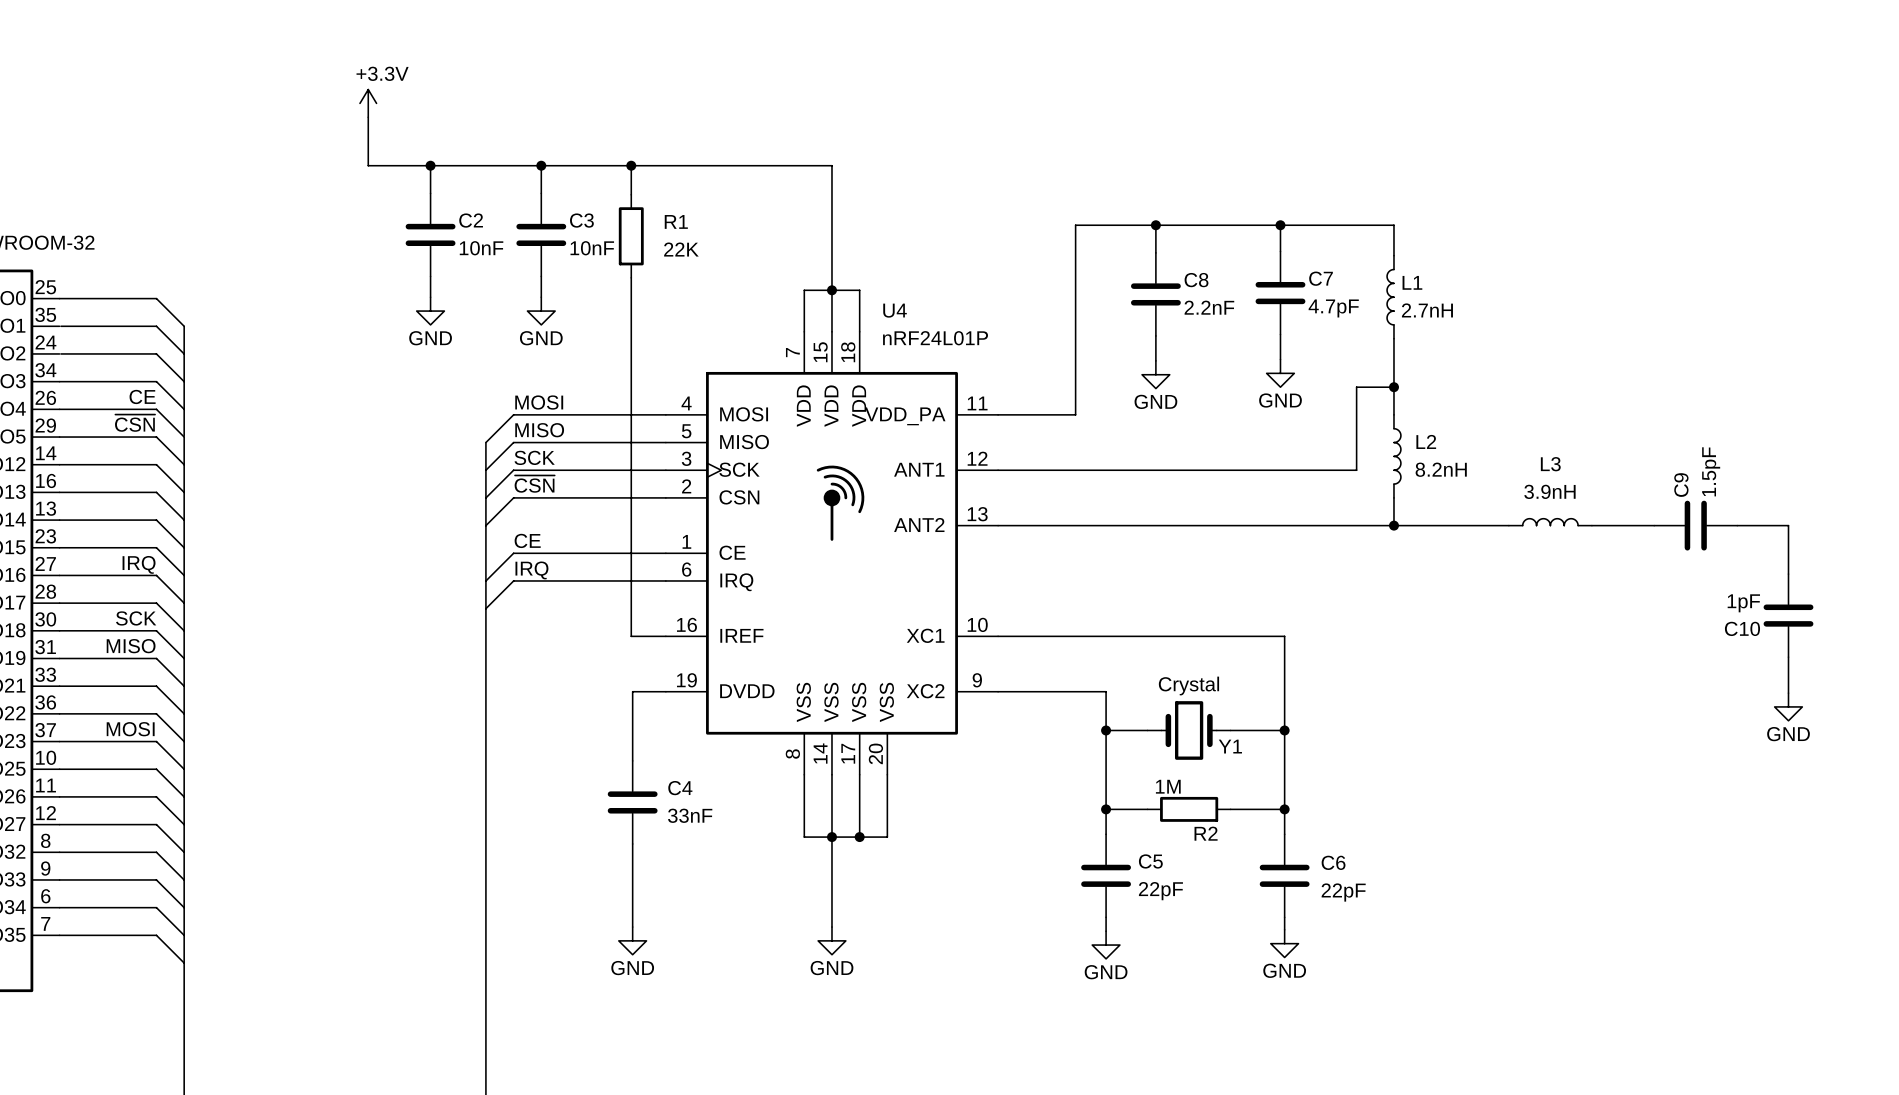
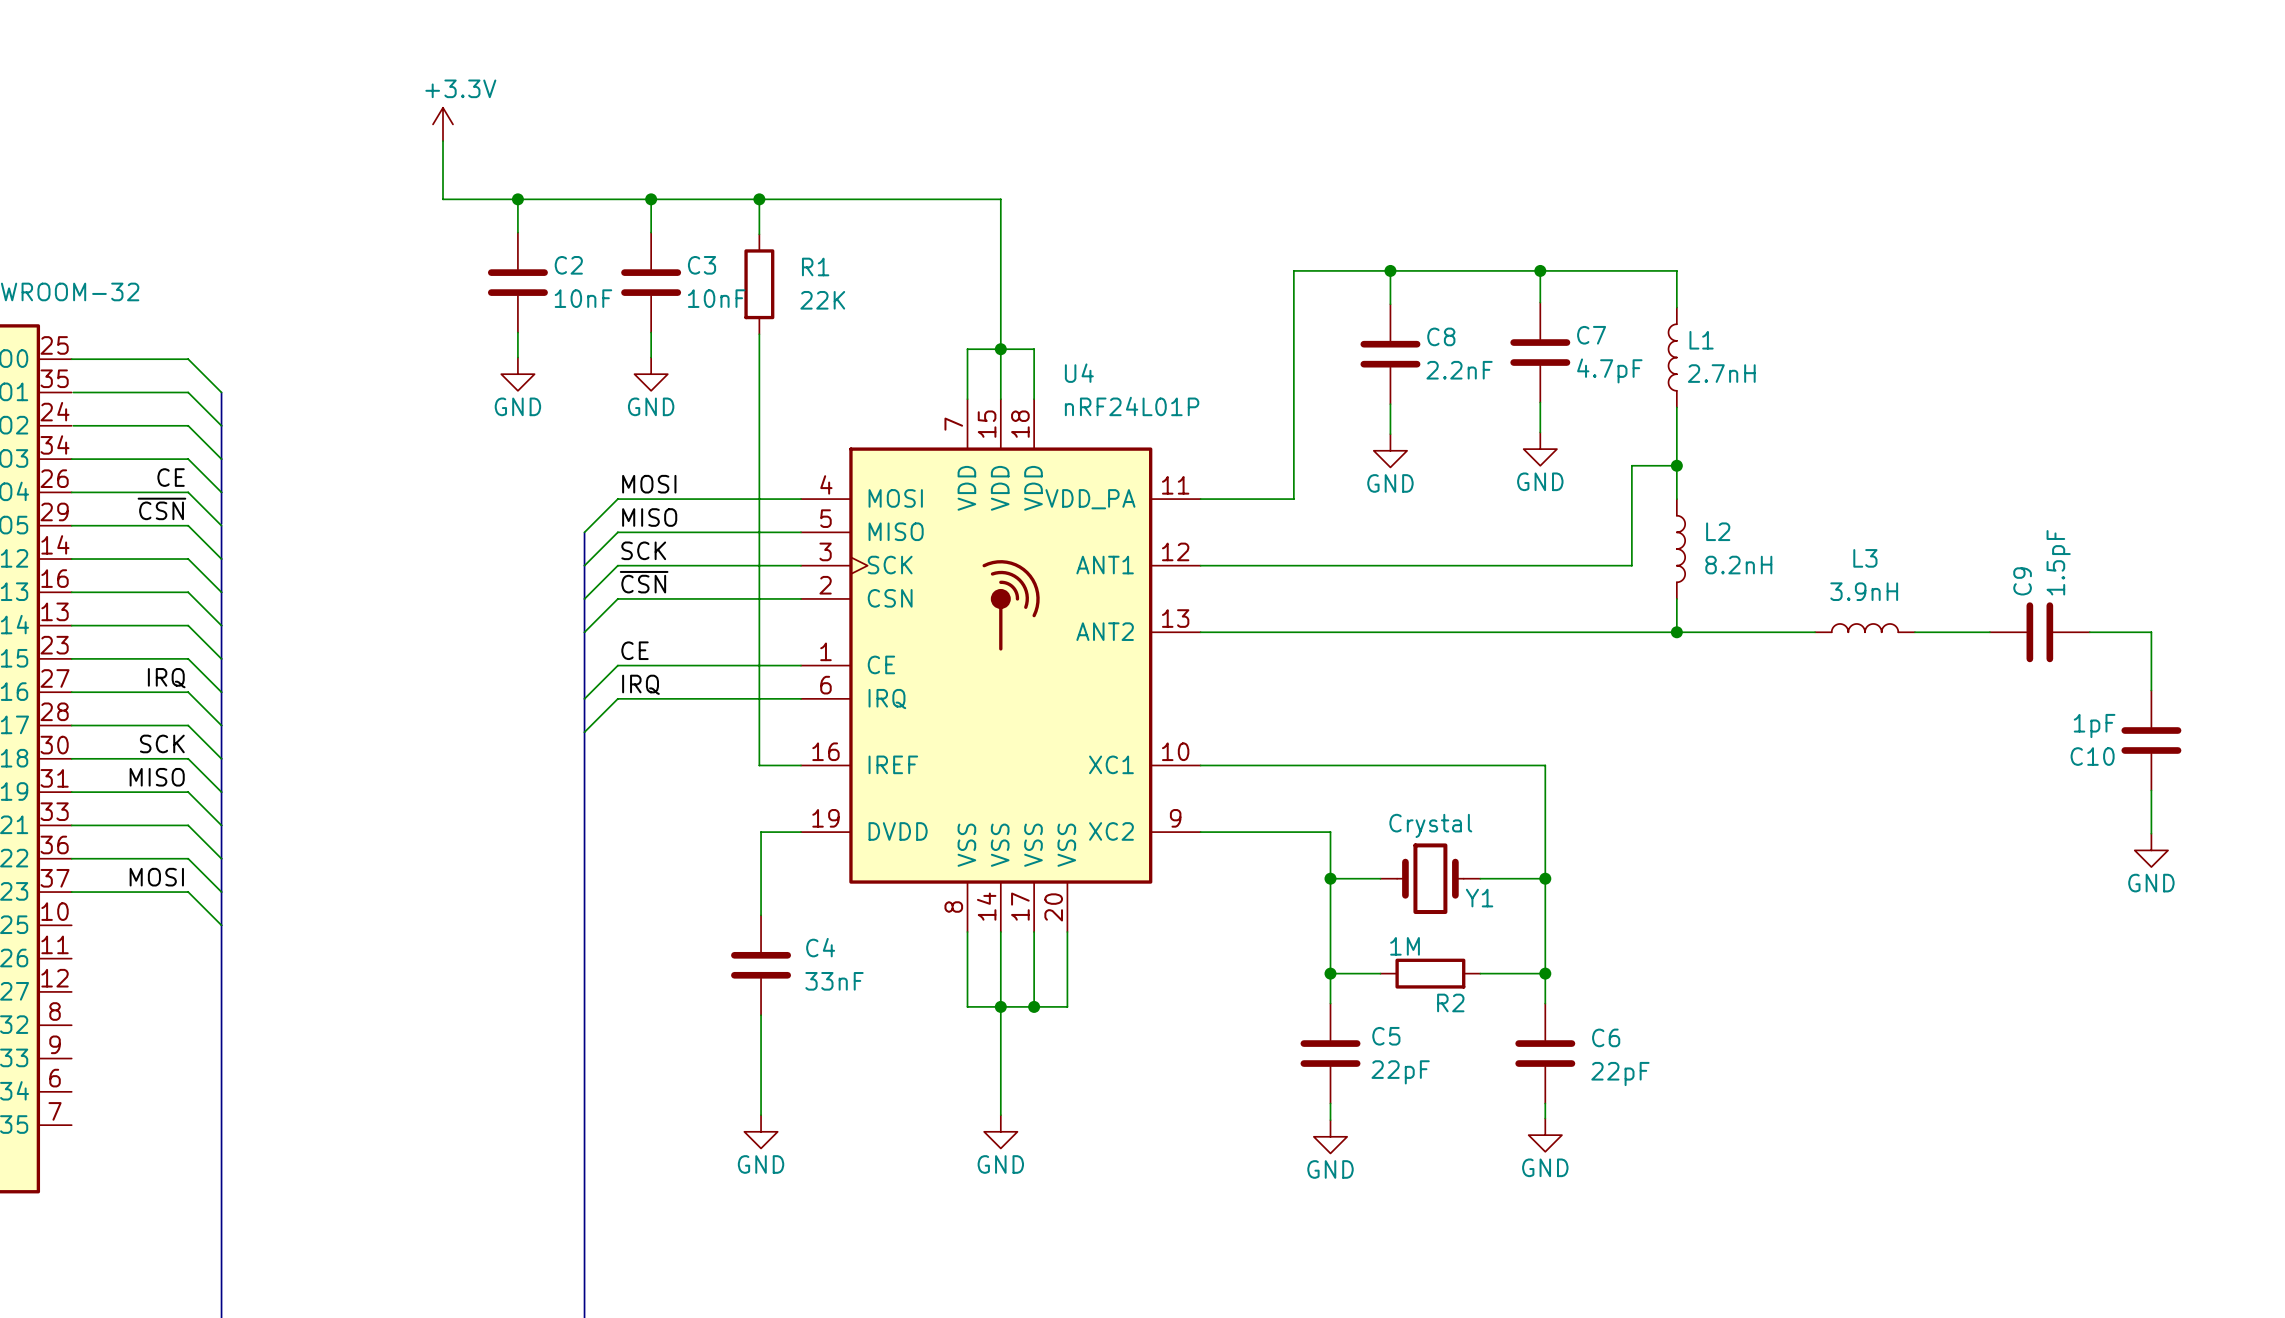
wire: (59, 769) (156, 769) (184, 796) -> none
wire: (59, 796) (156, 796) (184, 824) -> none
wire: (59, 824) (156, 824) (184, 852) -> none
wire: (59, 852) (156, 852) (184, 879) -> none
wire: (59, 879) (156, 879) (184, 907) -> none
wire: (59, 907) (156, 907) (184, 935) -> none
wire: (59, 935) (156, 935) (184, 963) -> none

